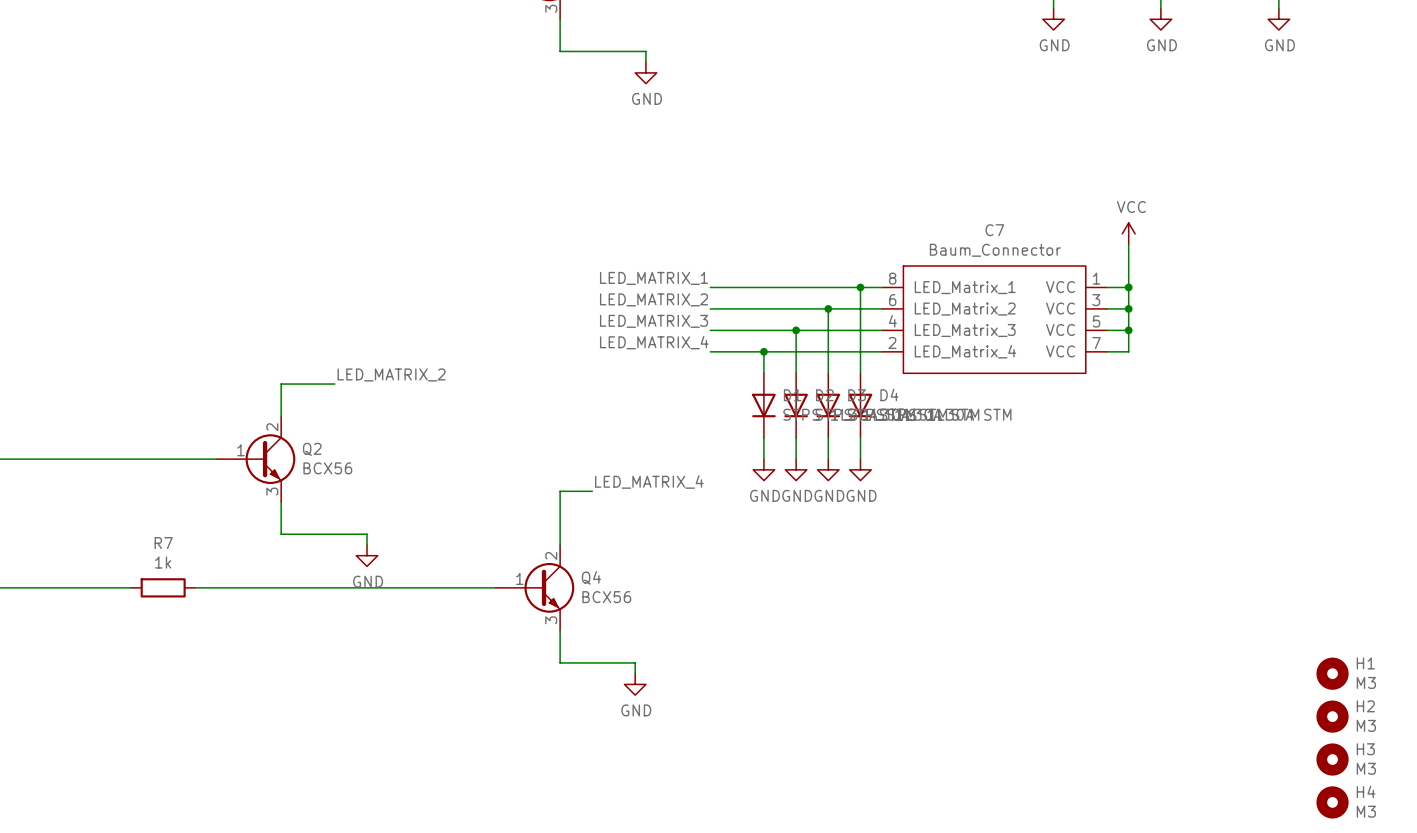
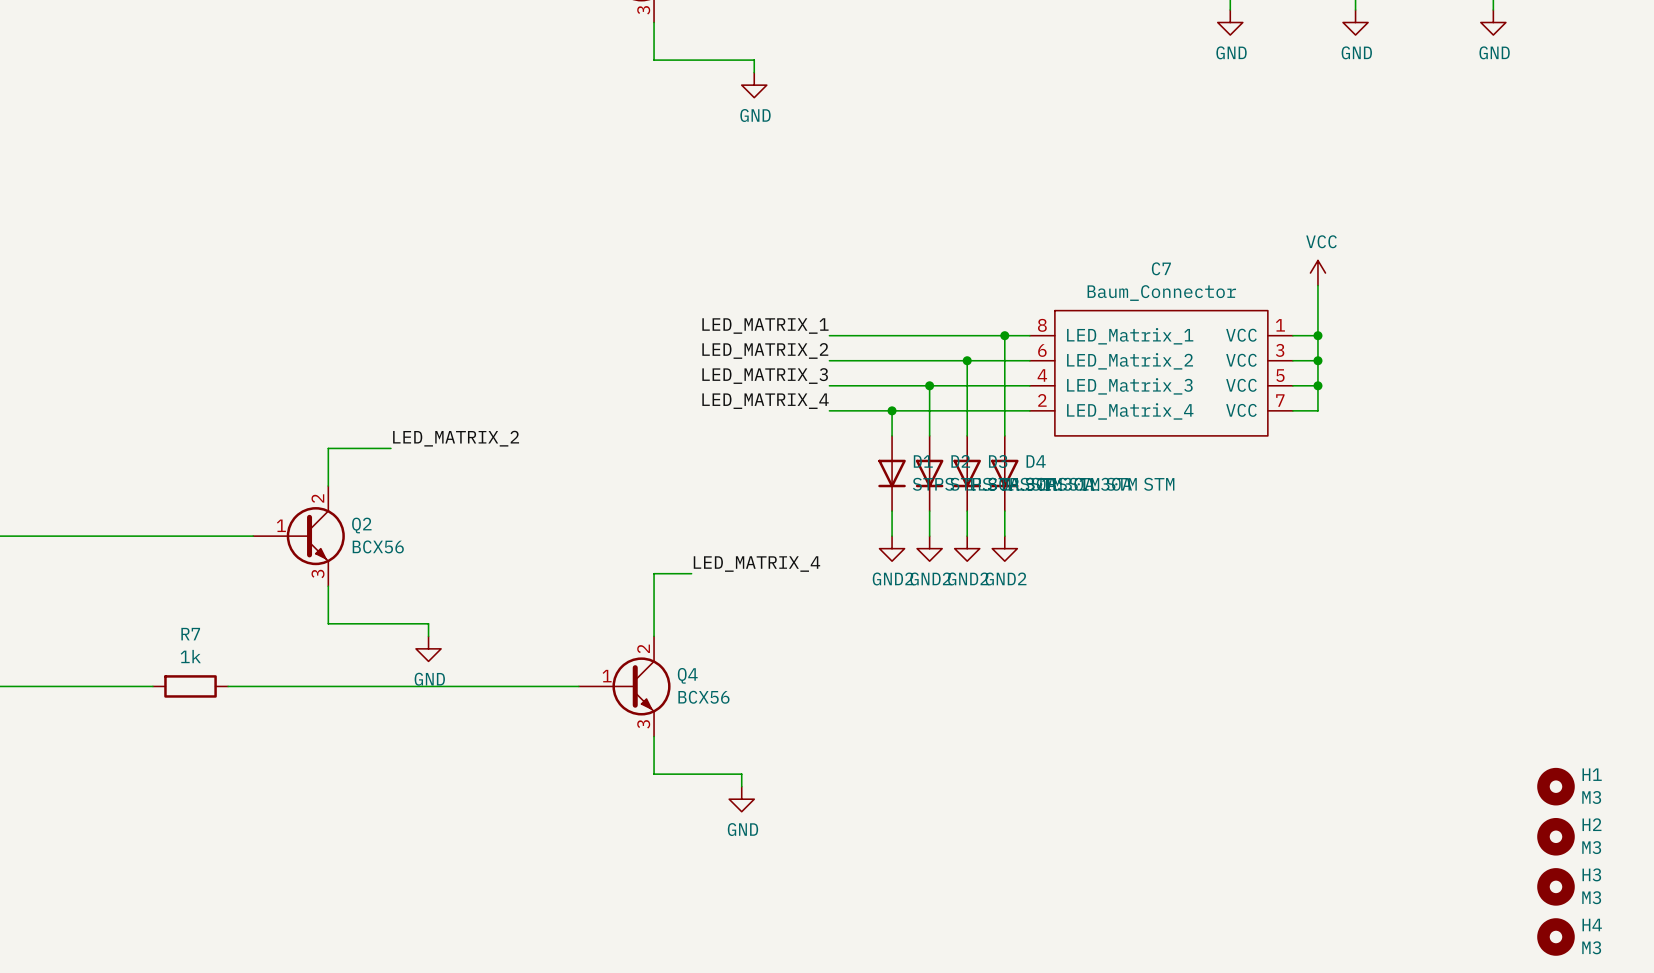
power symbol: GND (763, 469) -> GND2 (892, 548)
power symbol: GND (796, 469) -> GND2 (929, 548)
power symbol: GND (828, 469) -> GND2 (967, 548)
power symbol: GND (860, 469) -> GND2 (1004, 548)

